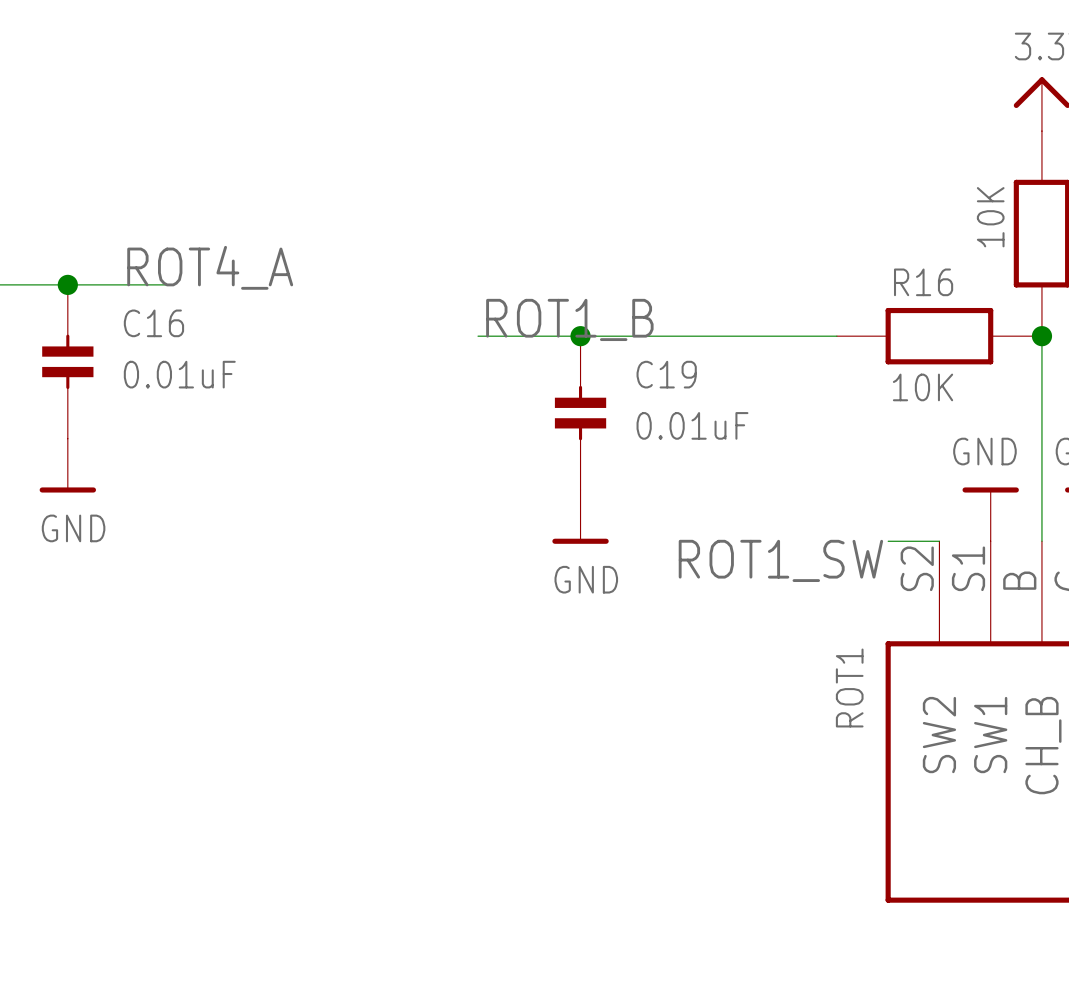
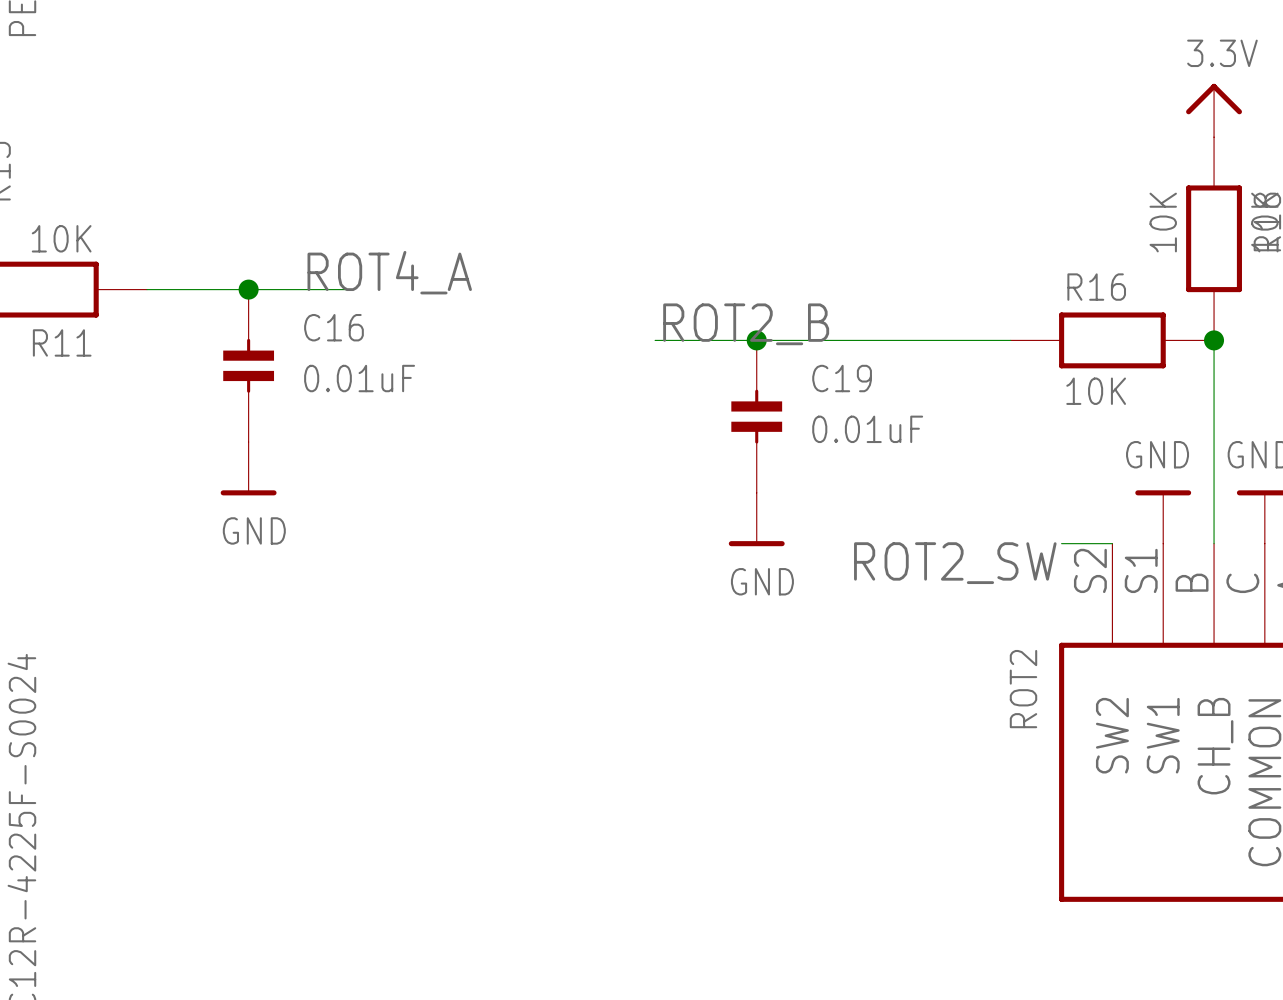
label: ROT1_B (569, 319) -> ROT2_B (746, 324)
label: ROT1_SW (780, 560) -> ROT2_SW (955, 563)
ROT1 name: ROT1 (849, 687) -> ROT2 (1023, 689)

